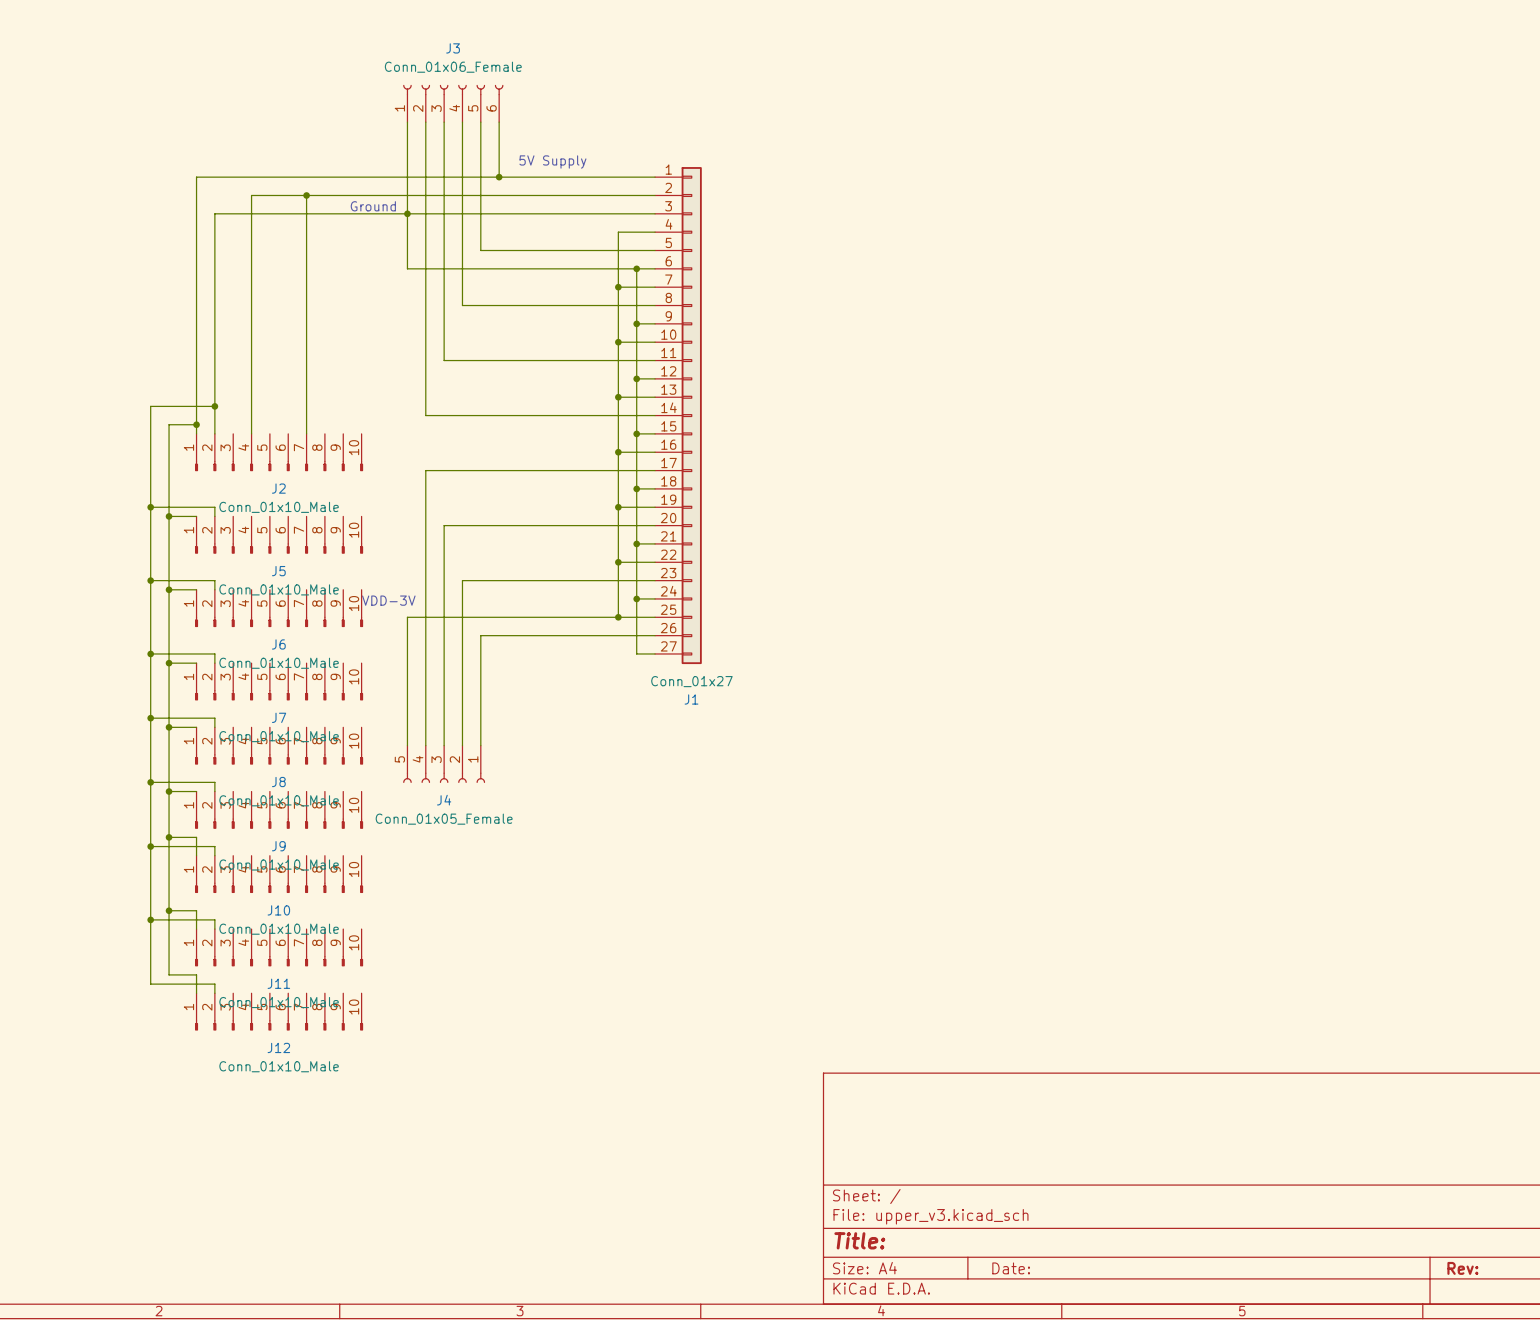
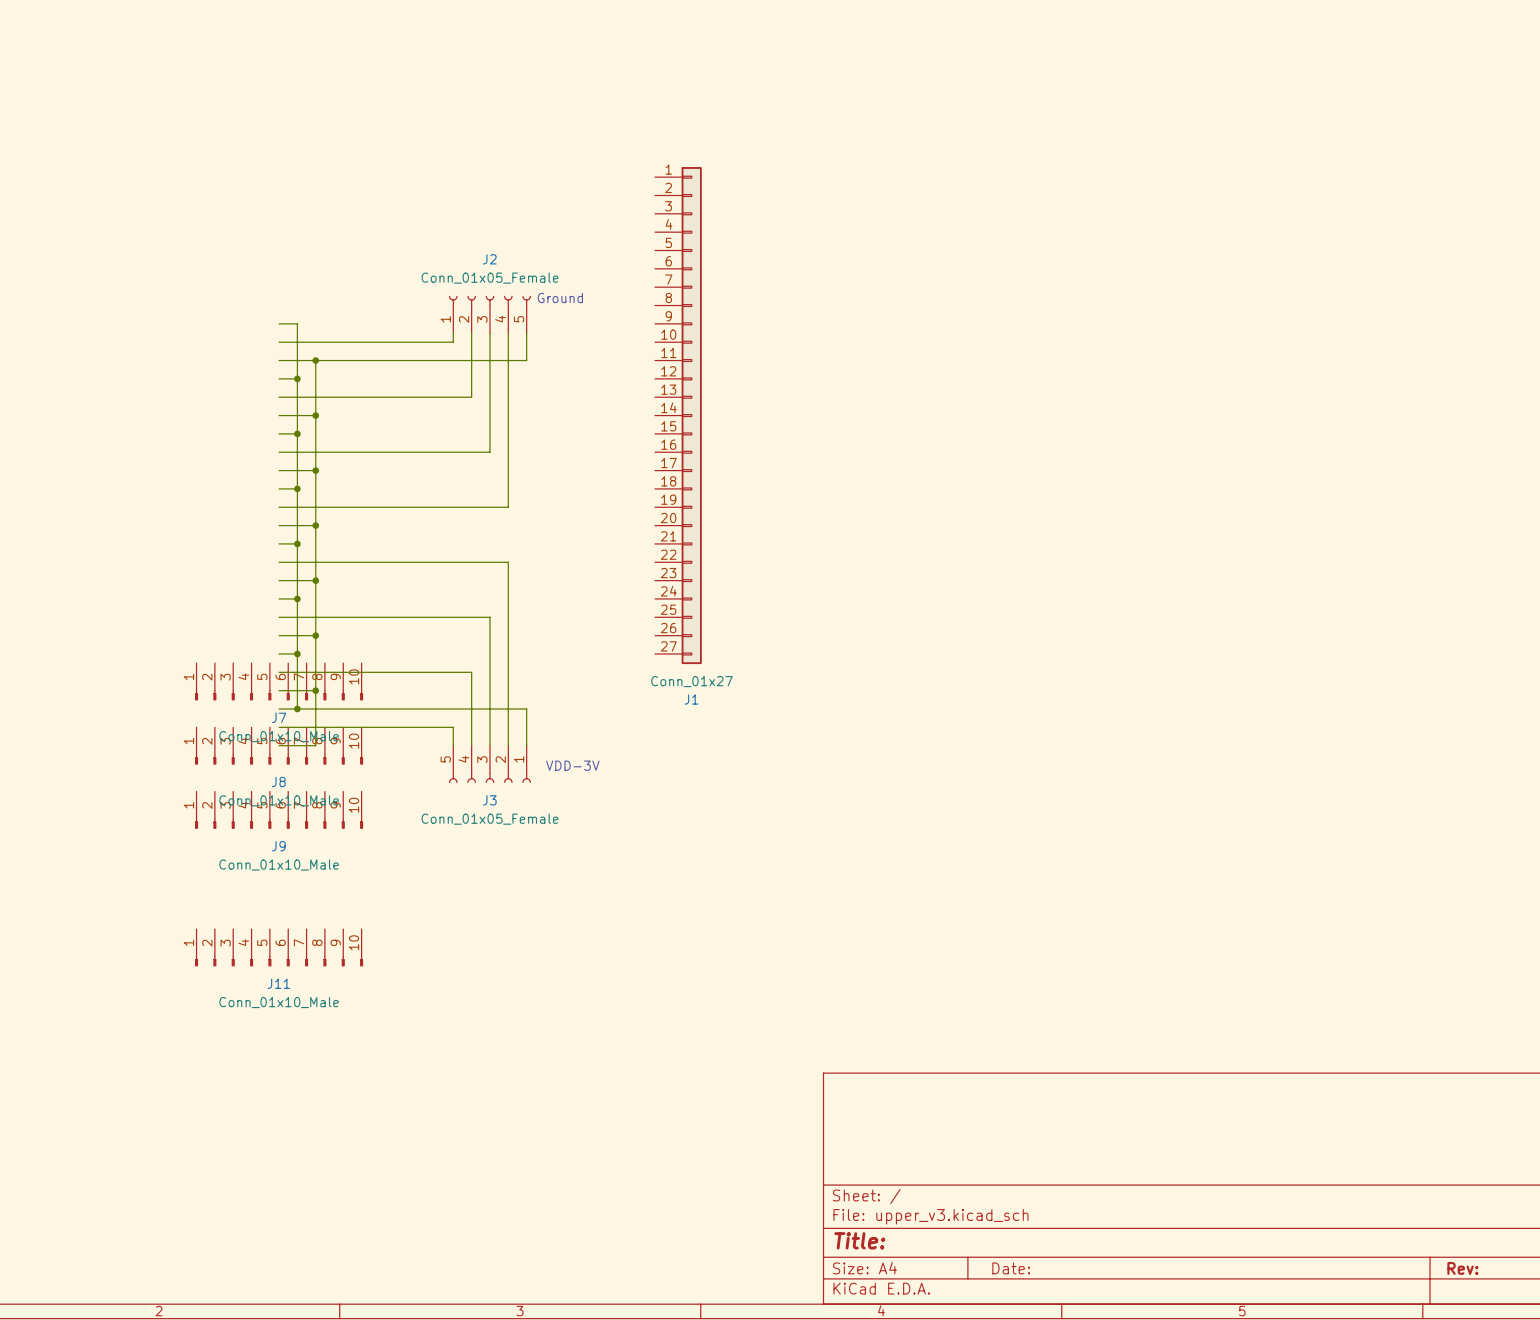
J3 name position: J3 (453, 48) -> J3 (489, 800)
J3 value: Conn_01x06_Female (453, 67) -> Conn_01x05_Female (489, 819)
J3 symbol: [403, 84, 504, 123] -> [449, 745, 531, 783]
wire: (407, 122) (407, 268) (655, 268) -> none
wire: (425, 122) (425, 415) (655, 415) -> none
wire: (444, 122) (444, 360) -> (279, 360) (444, 360)
wire: (462, 122) (462, 305) (655, 305) -> none
wire: (480, 122) (480, 250) (655, 250) -> none
wire: (499, 122) (499, 177) -> none
text: 5V Supply (552, 161) -> none
junction: (499, 177) -> none
wire: (655, 177) (196, 177) (196, 433) -> none
wire: (306, 195) (306, 433) -> none
junction: (306, 195) -> none
wire: (655, 195) (251, 195) (251, 433) -> none
text position: Ground (373, 206) -> Ground (560, 298)
junction: (407, 213) -> none
wire: (655, 213) (214, 213) (214, 433) -> none
wire: (655, 232) (618, 232) (618, 617) -> none
wire: (636, 268) (636, 653) (655, 653) -> none
junction: (636, 268) -> none
wire: (618, 287) (655, 287) -> none
junction: (618, 287) -> none
wire: none -> (279, 323) (297, 323) (297, 709)
wire: (636, 323) (655, 323) -> none
junction: (636, 323) -> none
wire: none -> (453, 333) (453, 342) (279, 342)
wire: none -> (471, 333) (471, 397) (279, 397)
wire: none -> (489, 333) (489, 452) (279, 452)
wire: none -> (508, 333) (508, 507) (279, 507)
wire: (618, 342) (655, 342) -> none
junction: (618, 342) -> none
wire: none -> (315, 360) (315, 745) (279, 745)
junction: none -> (315, 360)
wire: (526, 360) (655, 360) -> (526, 360) (526, 333)
wire: none -> (279, 378) (297, 378)
junction: none -> (297, 378)
wire: (636, 378) (655, 378) -> none
junction: (636, 378) -> none
wire: (618, 397) (655, 397) -> none
junction: (618, 397) -> none
wire: (214, 406) (150, 406) (150, 984) (214, 984) (214, 993) -> none
junction: (214, 406) -> none
wire: none -> (279, 415) (315, 415)
junction: none -> (315, 415)
wire: (196, 424) (169, 424) (169, 974) (196, 974) (196, 993) -> none
junction: (196, 424) -> none
J2 symbol: [195, 433, 364, 472] -> [449, 295, 531, 334]
wire: none -> (279, 433) (297, 433)
junction: none -> (297, 433)
wire: (636, 433) (655, 433) -> none
junction: (636, 433) -> none
wire: (618, 452) (655, 452) -> none
junction: (618, 452) -> none
wire: none -> (279, 470) (315, 470)
junction: none -> (315, 470)
wire: (655, 470) (425, 470) (425, 745) -> none
J2 name position: J2 (278, 488) -> J2 (489, 259)
wire: none -> (279, 488) (297, 488)
junction: none -> (297, 488)
wire: (636, 488) (655, 488) -> none
junction: (636, 488) -> none
wire: (150, 507) (214, 507) (214, 516) -> none
junction: (150, 507) -> none
J2 value: Conn_01x10_Male (279, 507) -> Conn_01x05_Female (489, 278)
wire: (618, 507) (655, 507) -> none
junction: (618, 507) -> none
wire: (169, 516) (196, 516) -> none
junction: (169, 516) -> none
wire: none -> (279, 525) (315, 525)
junction: none -> (315, 525)
wire: (655, 525) (444, 525) (444, 745) -> none
J5: Conn_01x10_Male (279, 535) -> none
wire: none -> (279, 543) (297, 543)
junction: none -> (297, 543)
wire: (636, 543) (655, 543) -> none
junction: (636, 543) -> none
wire: none -> (279, 562) (508, 562) (508, 745)
wire: (618, 562) (655, 562) -> none
junction: (618, 562) -> none
wire: (150, 580) (214, 580) (214, 589) -> none
junction: (150, 580) -> none
wire: none -> (279, 580) (315, 580)
junction: none -> (315, 580)
wire: (655, 580) (462, 580) (462, 745) -> none
wire: (169, 589) (196, 589) -> none
junction: (169, 589) -> none
wire: none -> (279, 598) (297, 598)
junction: none -> (297, 598)
wire: (636, 598) (655, 598) -> none
junction: (636, 598) -> none
text: VDD-3V (388, 600) -> none
J6: Conn_01x10_Male (279, 608) -> none
wire: (407, 617) (407, 745) -> (407, 617) (279, 617)
wire: (489, 617) (655, 617) -> (489, 617) (489, 745)
junction: (618, 617) -> none
wire: none -> (279, 635) (315, 635)
junction: none -> (315, 635)
wire: (655, 635) (480, 635) (480, 745) -> none
wire: (150, 653) (214, 653) (214, 663) -> none
junction: (150, 653) -> none
wire: none -> (279, 653) (297, 653)
junction: none -> (297, 653)
wire: (169, 663) (196, 663) -> none
junction: (169, 663) -> none
wire: none -> (279, 672) (471, 672) (471, 745)
wire: none -> (279, 690) (315, 690)
junction: none -> (315, 690)
wire: none -> (279, 709) (526, 709) (526, 745)
junction: none -> (297, 709)
wire: (150, 718) (214, 718) (214, 727) -> none
junction: (150, 718) -> none
wire: (169, 727) (196, 727) -> none
junction: (169, 727) -> none
wire: none -> (279, 727) (453, 727) (453, 745)
J4: Conn_01x05_Female (444, 764) -> none
text: none -> VDD-3V (572, 765)
wire: (150, 782) (214, 782) (214, 791) -> none
junction: (150, 782) -> none
wire: (169, 791) (196, 791) -> none
junction: (169, 791) -> none
wire: (169, 837) (196, 837) (196, 855) -> none
junction: (169, 837) -> none
wire: (150, 846) (214, 846) (214, 855) -> none
junction: (150, 846) -> none
J10: Conn_01x10_Male (279, 874) -> none
wire: (169, 910) (196, 910) (196, 929) -> none
junction: (169, 910) -> none
wire: (150, 919) (214, 919) (214, 929) -> none
junction: (150, 919) -> none
J12: Conn_01x10_Male (279, 1011) -> none

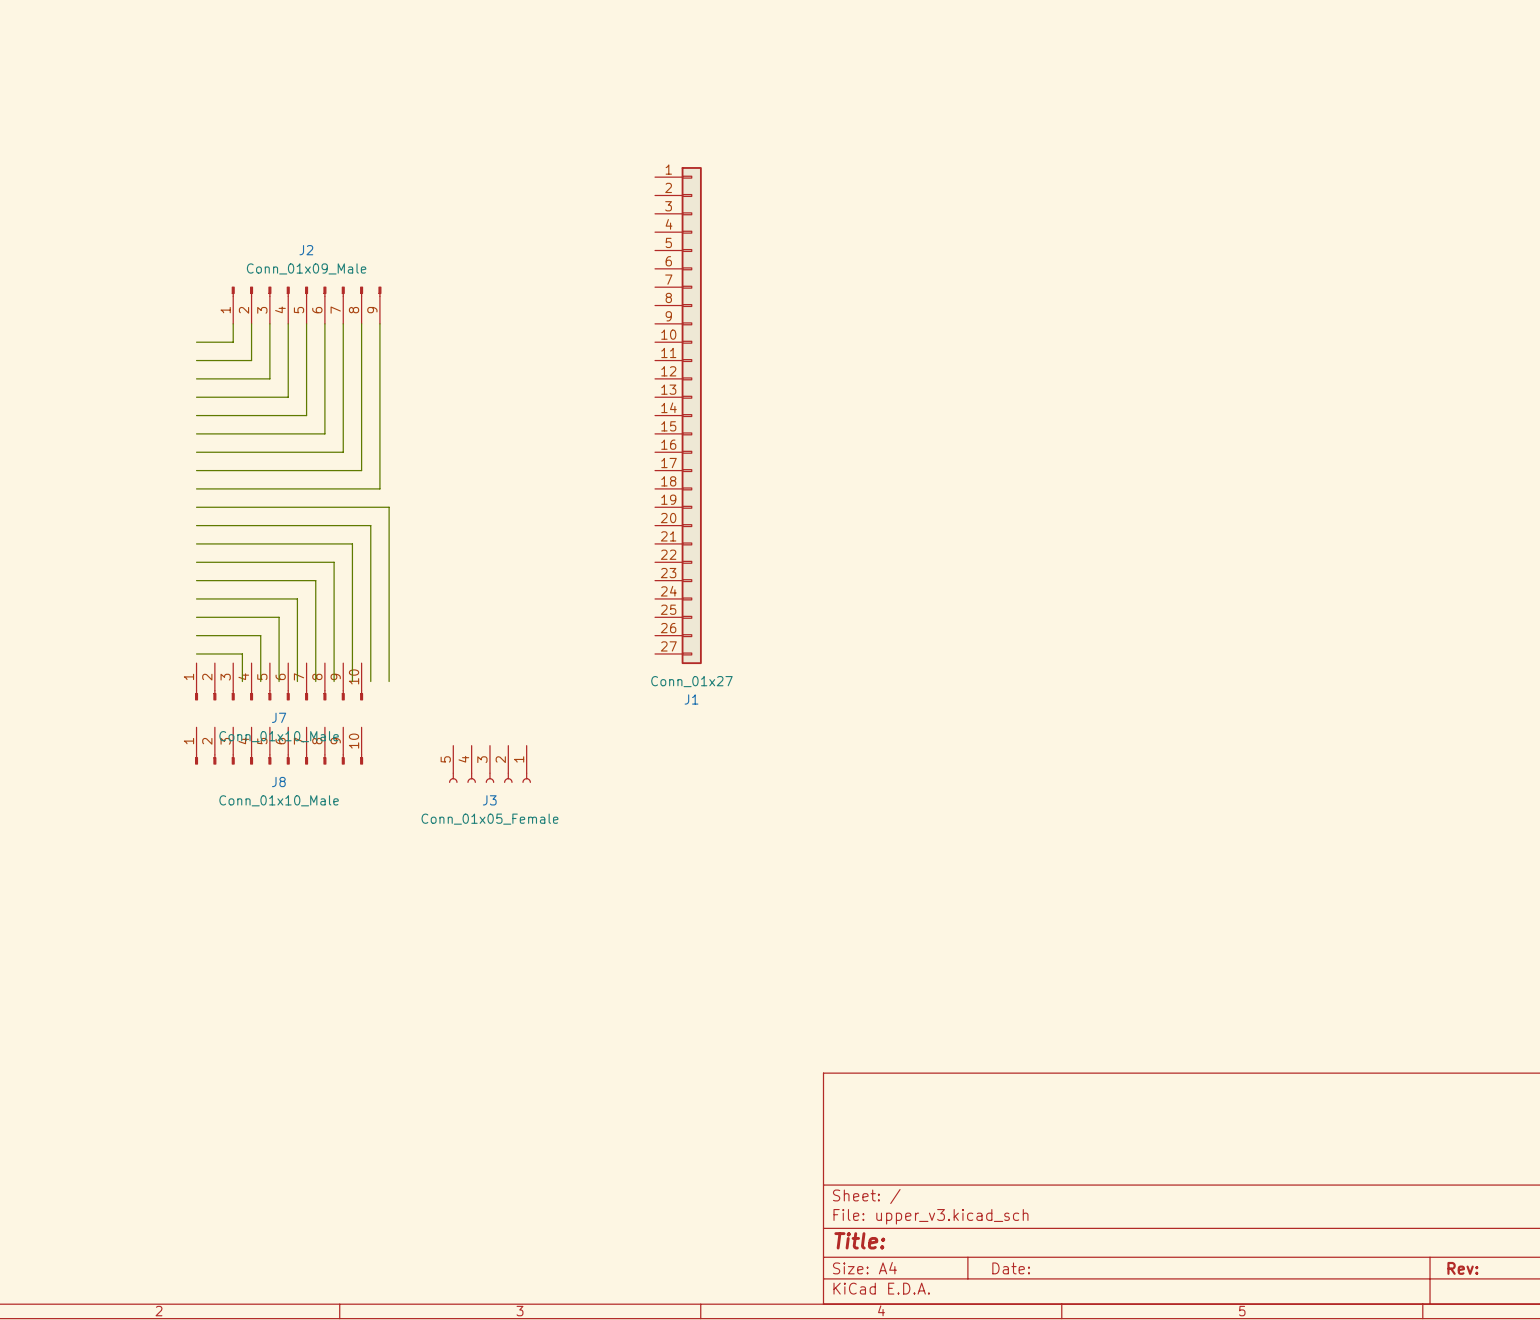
J2 value: Conn_01x05_Female (489, 278) -> Conn_01x09_Male (306, 268)
J2 symbol: [449, 295, 531, 334] -> [231, 286, 382, 324]
text: Ground (560, 298) -> none
wire: none -> (233, 323) (233, 342) (196, 342)
wire: none -> (251, 323) (251, 360) (196, 360)
wire: none -> (269, 323) (269, 378) (196, 378)
wire: (279, 323) (297, 323) (297, 598) -> none
wire: none -> (324, 323) (324, 433) (297, 433)
wire: none -> (361, 323) (361, 470) (315, 470)
wire: none -> (379, 323) (379, 488) (297, 488)
wire: (453, 333) (453, 342) (279, 342) -> none
wire: (471, 333) (471, 397) (288, 397) -> (288, 323) (288, 397)
wire: (489, 333) (489, 452) (343, 452) -> (343, 323) (343, 452)
wire: (508, 333) (508, 507) (389, 507) -> (389, 681) (389, 507)
wire: (526, 333) (526, 360) (279, 360) -> none
wire: (315, 360) (315, 580) -> none
junction: (315, 360) -> none
wire: (279, 378) (297, 378) -> none
junction: (297, 378) -> none
wire: none -> (196, 397) (279, 397)
wire: none -> (196, 415) (279, 415)
wire: (306, 415) (315, 415) -> (306, 415) (306, 323)
junction: (315, 415) -> none
wire: none -> (196, 433) (279, 433)
junction: (297, 433) -> none
wire: none -> (196, 452) (279, 452)
wire: none -> (196, 470) (279, 470)
junction: (315, 470) -> none
wire: none -> (196, 488) (279, 488)
junction: (297, 488) -> none
wire: none -> (196, 507) (279, 507)
wire: none -> (196, 525) (279, 525)
wire: none -> (315, 525) (370, 525) (370, 681)
junction: (315, 525) -> none
wire: none -> (196, 543) (279, 543)
wire: none -> (297, 543) (352, 543) (352, 681)
junction: (297, 543) -> none
wire: none -> (196, 562) (279, 562)
wire: (334, 562) (508, 562) (508, 745) -> (334, 562) (334, 681)
wire: none -> (196, 580) (279, 580)
junction: (315, 580) -> none
wire: none -> (196, 598) (279, 598)
junction: (297, 598) -> none
wire: none -> (196, 617) (279, 617) (279, 681)
wire: (279, 617) (489, 617) (489, 745) -> none
wire: none -> (196, 635) (260, 635) (260, 681)
wire: (279, 635) (315, 635) -> none
junction: (315, 635) -> none
wire: none -> (196, 653) (242, 653) (242, 681)
wire: (279, 653) (297, 653) -> none
junction: (297, 653) -> none
wire: (279, 672) (471, 672) (471, 745) -> none
wire: (297, 681) (297, 709) -> none
wire: (315, 681) (315, 745) (279, 745) -> none
wire: (279, 690) (315, 690) -> none
junction: (315, 690) -> none
wire: (279, 709) (526, 709) (526, 745) -> none
junction: (297, 709) -> none
wire: (279, 727) (453, 727) (453, 745) -> none
text: VDD-3V (572, 765) -> none
J9: Conn_01x10_Male (279, 810) -> none
J11: Conn_01x10_Male (279, 947) -> none

